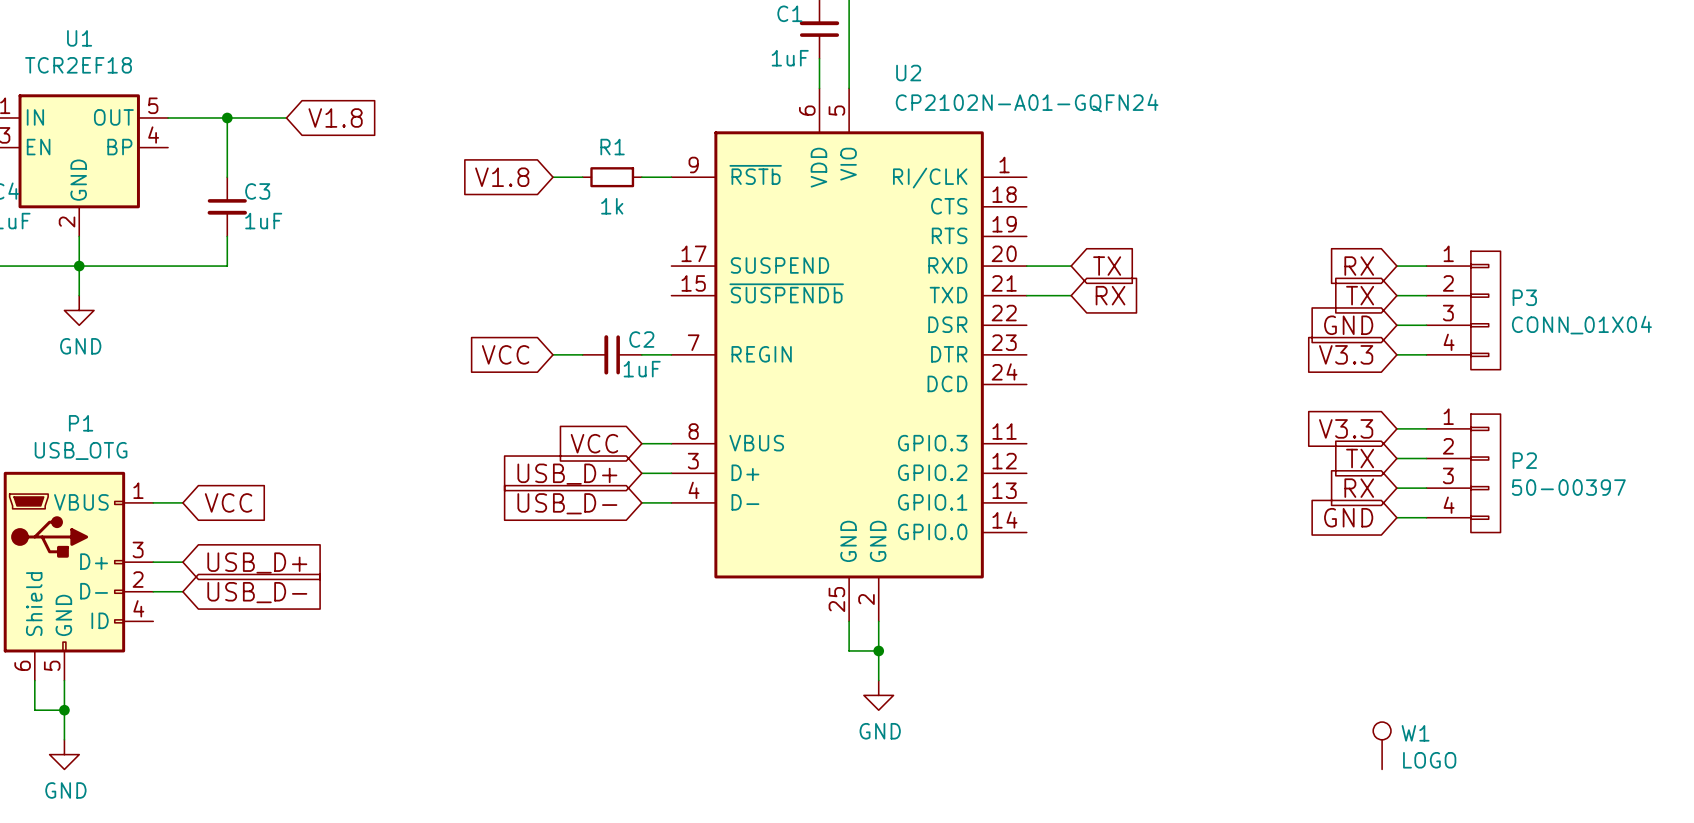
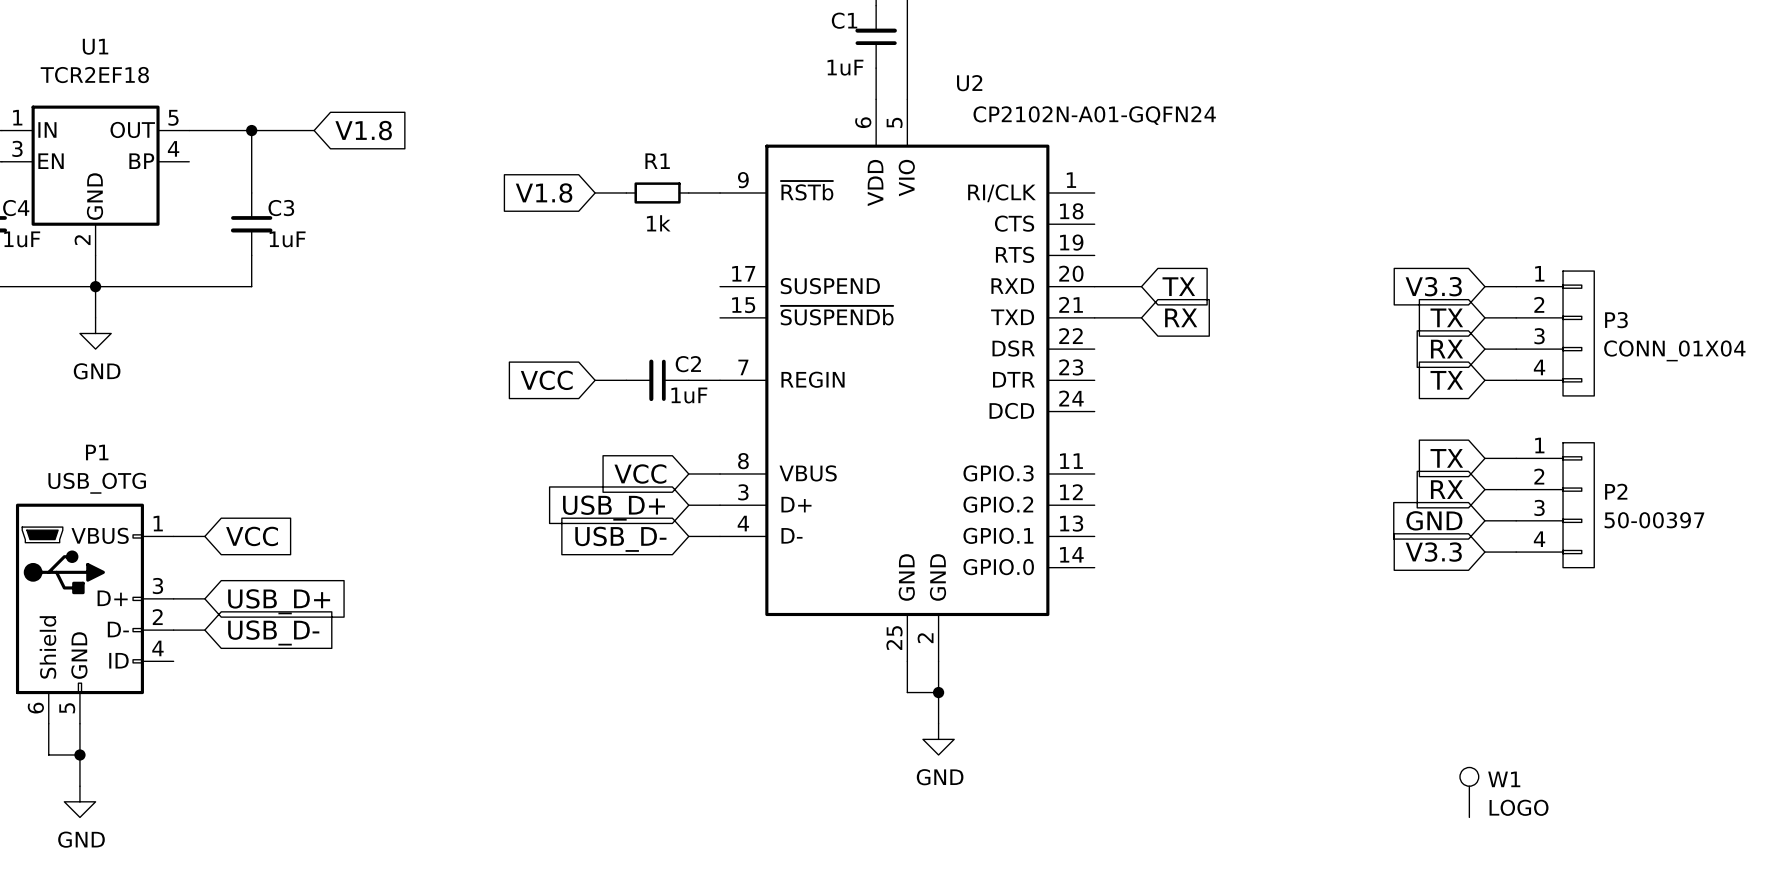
global label: RX (1359, 266) -> V3.3 (1433, 286)
global label: GND (1348, 325) -> RX (1447, 349)
global label: V3.3 (1346, 354) -> TX (1446, 380)
global label: V3.3 (1346, 428) -> TX (1446, 458)
global label: TX (1360, 458) -> RX (1447, 489)
global label: RX (1359, 488) -> GND (1434, 520)
global label: GND (1348, 517) -> V3.3 (1433, 552)

